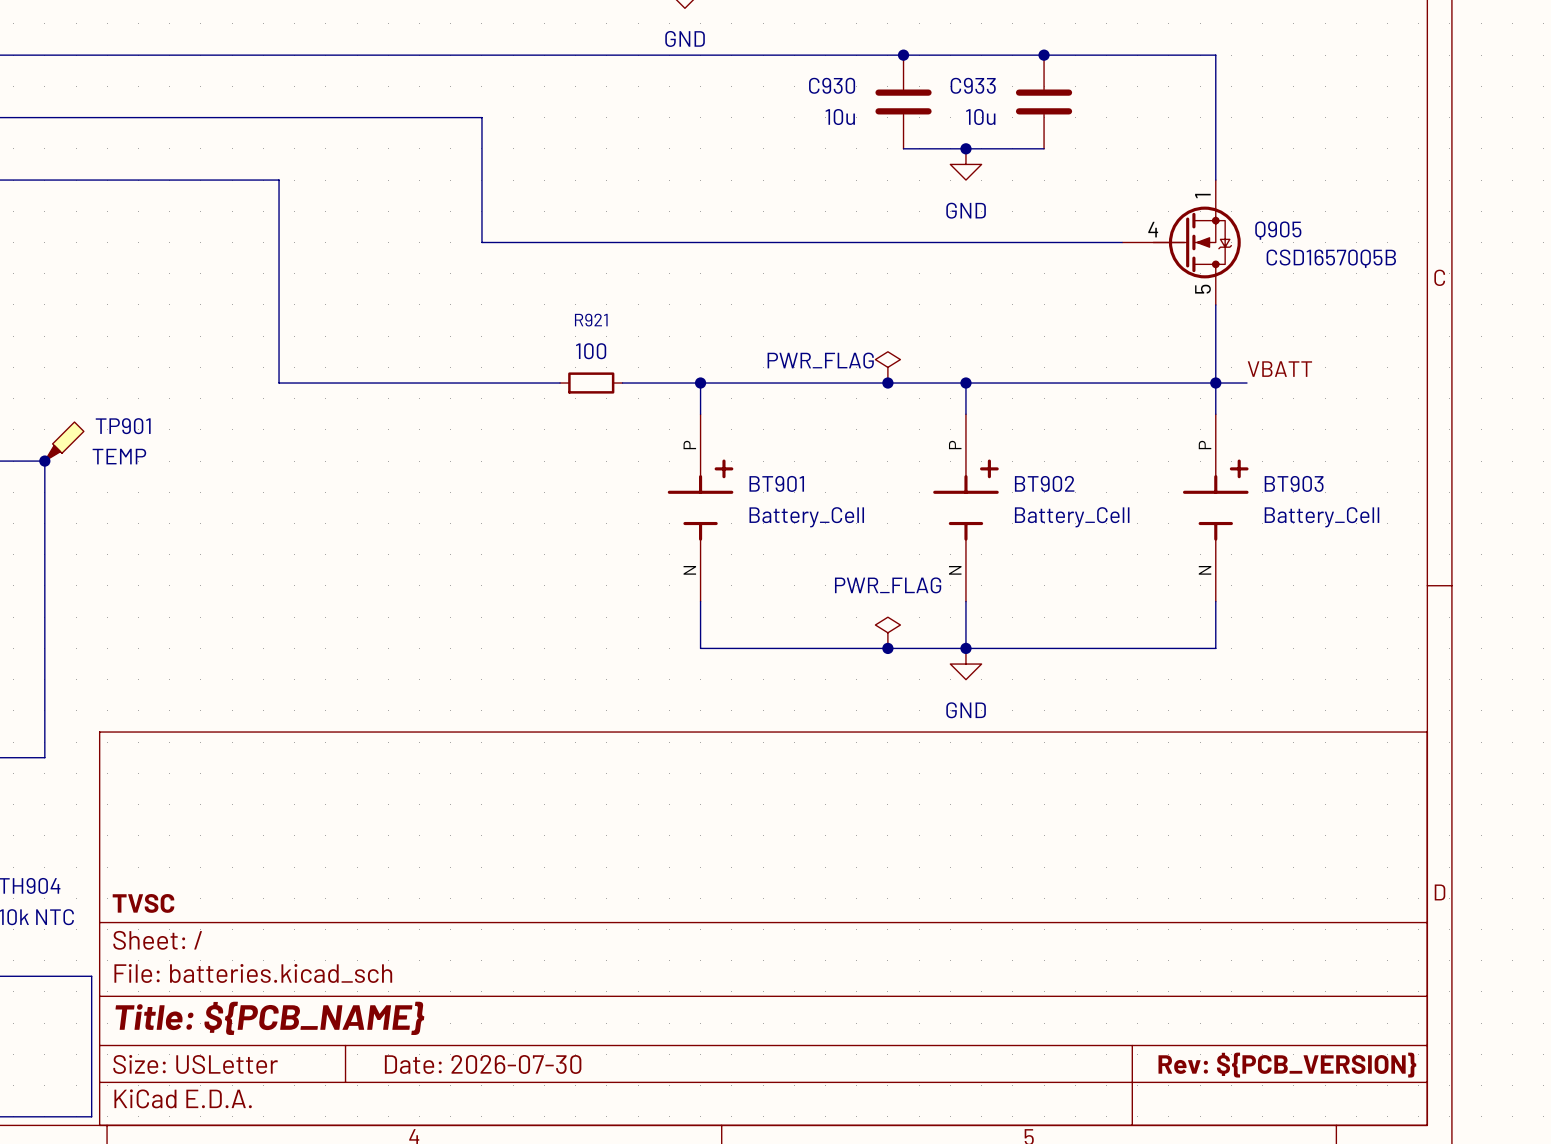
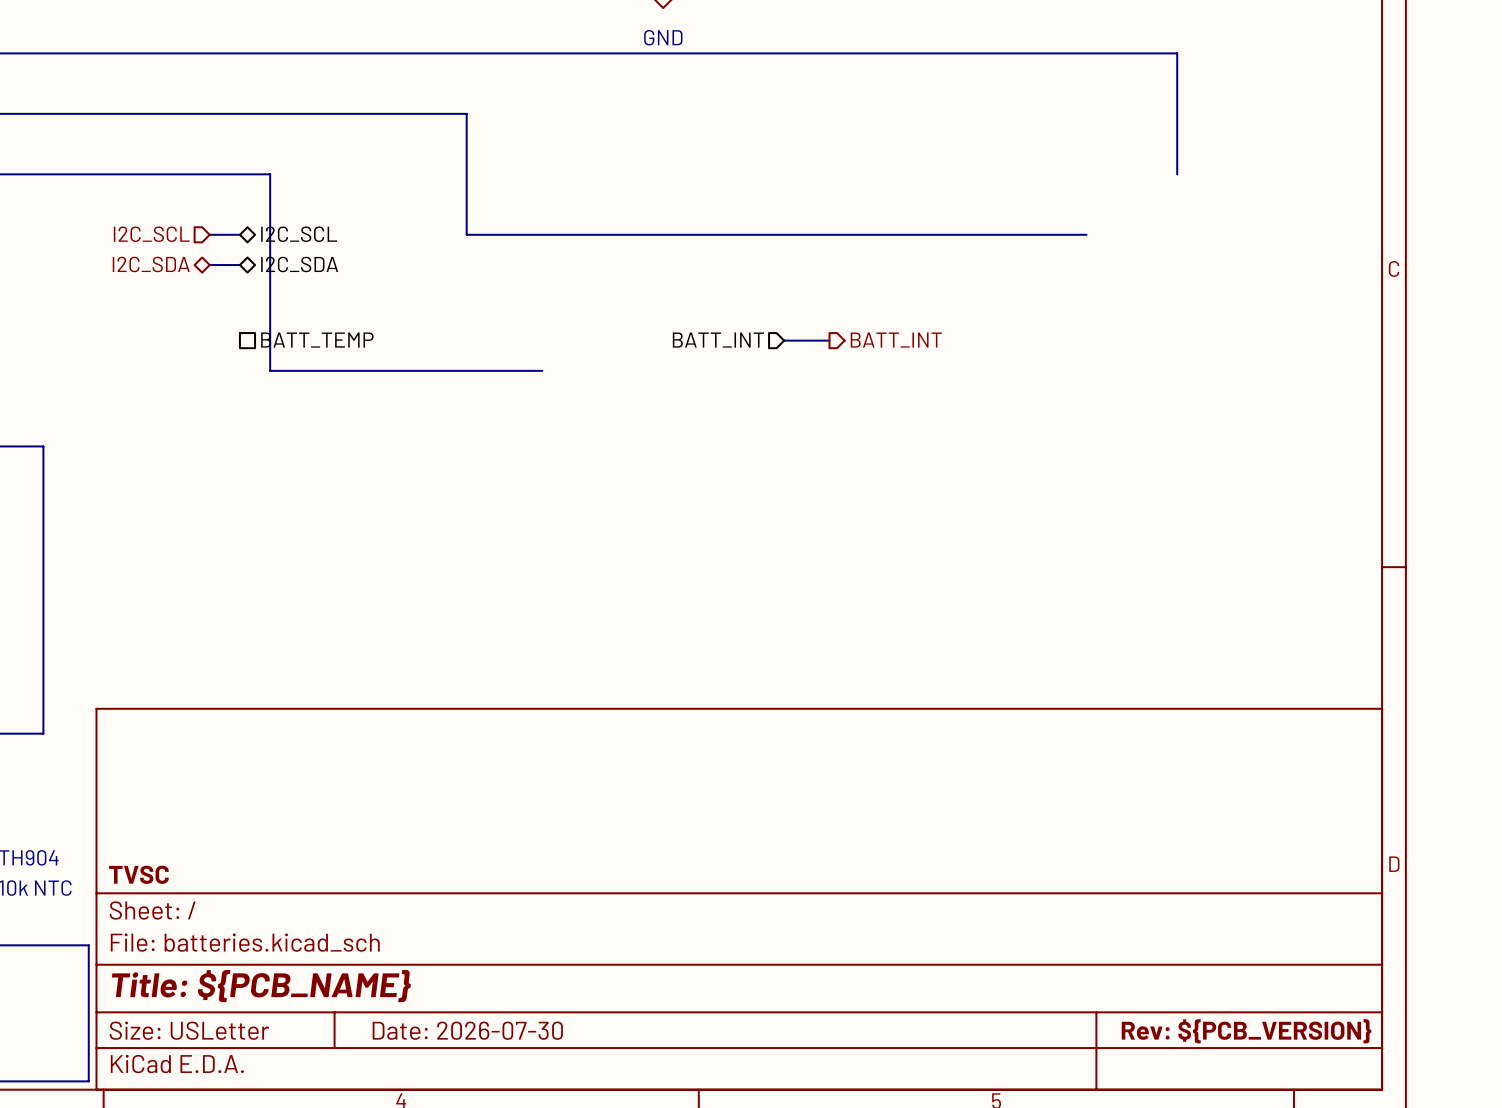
junction: (903, 55) -> none
junction: (1044, 55) -> none
C930: 10u (903, 101) -> none
C933: 10u (1044, 101) -> none
wire: (903, 148) (1044, 148) -> none
junction: (965, 148) -> none
power symbol: GND (965, 164) -> none
hierarchical label: none -> I2C_SCL (151, 234)
sheet pin: none -> I2C_SCL (299, 234)
wire: none -> (209, 234) (239, 234)
Q905: CSD16570Q5B (1181, 242) -> none
hierarchical label: none -> I2C_SDA (151, 264)
wire: none -> (209, 265) (239, 265)
sheet pin: none -> I2C_SDA (299, 264)
wire: (1215, 304) (1215, 414) -> none
sheet pin: none -> BATT_TEMP (317, 340)
sheet pin: none -> BATT_INT (718, 340)
wire: none -> (784, 340) (829, 340)
hierarchical label: none -> BATT_INT (896, 340)
power symbol: PWR_FLAG (887, 367) -> none
label: VBATT (1279, 369) -> none
R921: 100 (591, 383) -> none
wire: (622, 383) (1247, 383) -> none
wire: (700, 383) (700, 414) -> none
junction: (700, 383) -> none
junction: (887, 383) -> none
wire: (965, 383) (965, 414) -> none
junction: (965, 383) -> none
junction: (1215, 383) -> none
TP901: TEMP (64, 441) -> none
junction: (44, 461) -> none
BT901: Battery_Cell (700, 507) -> none
BT902: Battery_Cell (965, 507) -> none
BT903: Battery_Cell (1215, 507) -> none
wire: (700, 601) (700, 648) (1215, 648) (1215, 601) -> none
wire: (965, 601) (965, 648) -> none
power symbol: PWR_FLAG (887, 632) -> none
junction: (887, 648) -> none
junction: (965, 648) -> none
power symbol: GND (965, 664) -> none

